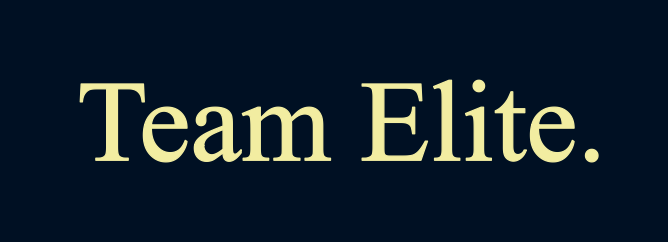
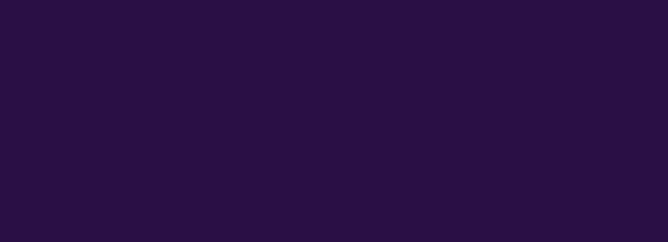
drawing: [361, 79, 599, 163] -> none
drawing: [79, 83, 332, 163] -> none

